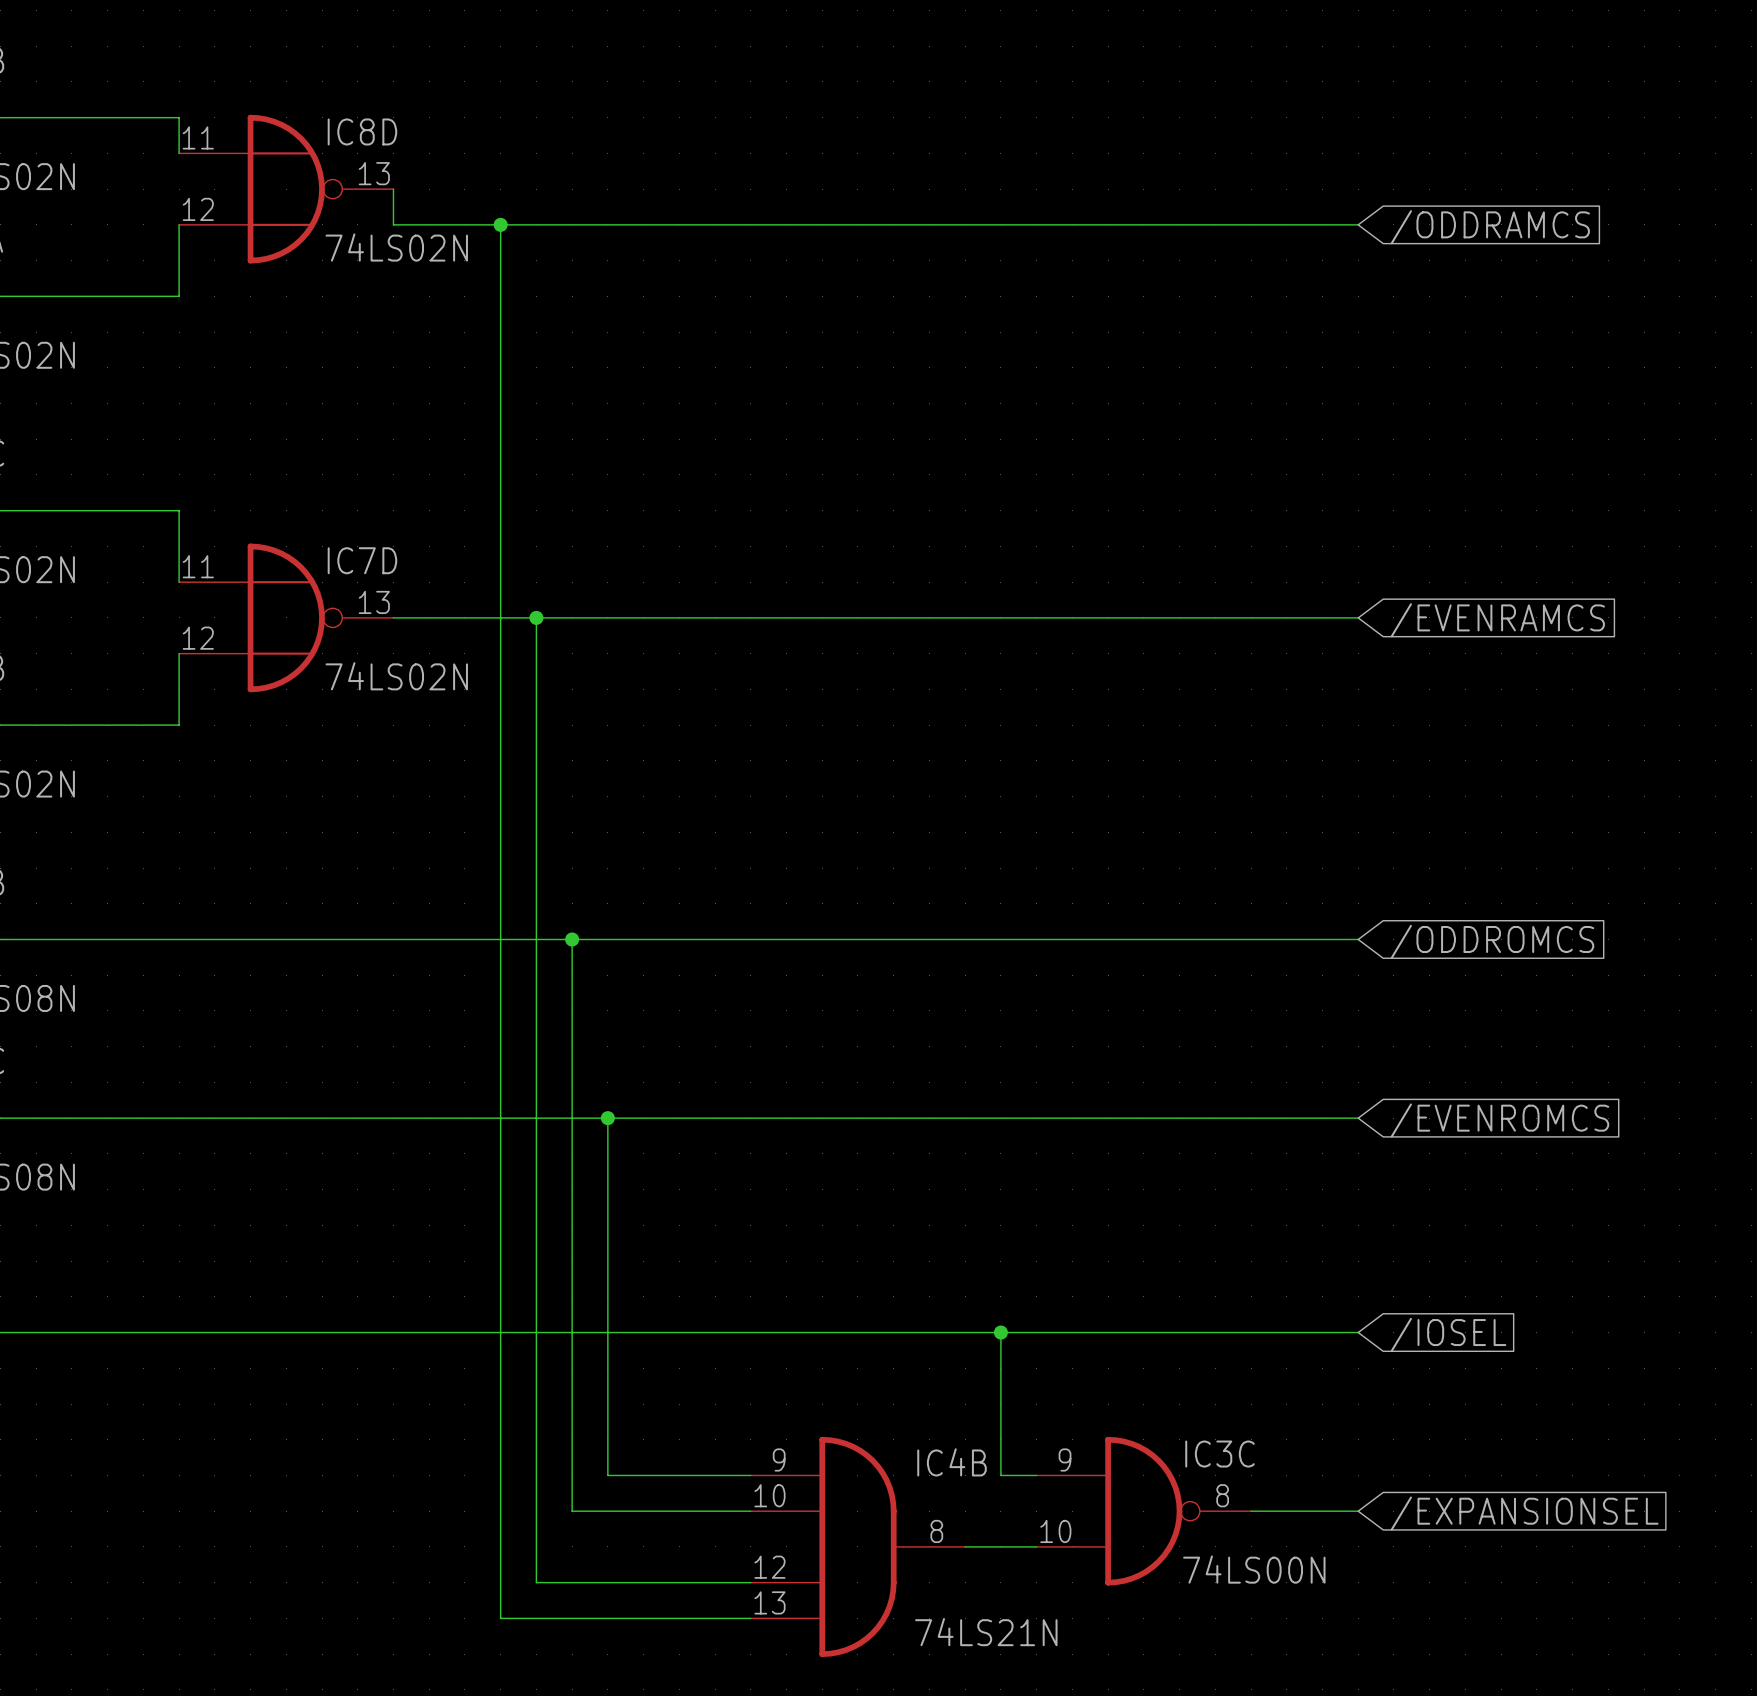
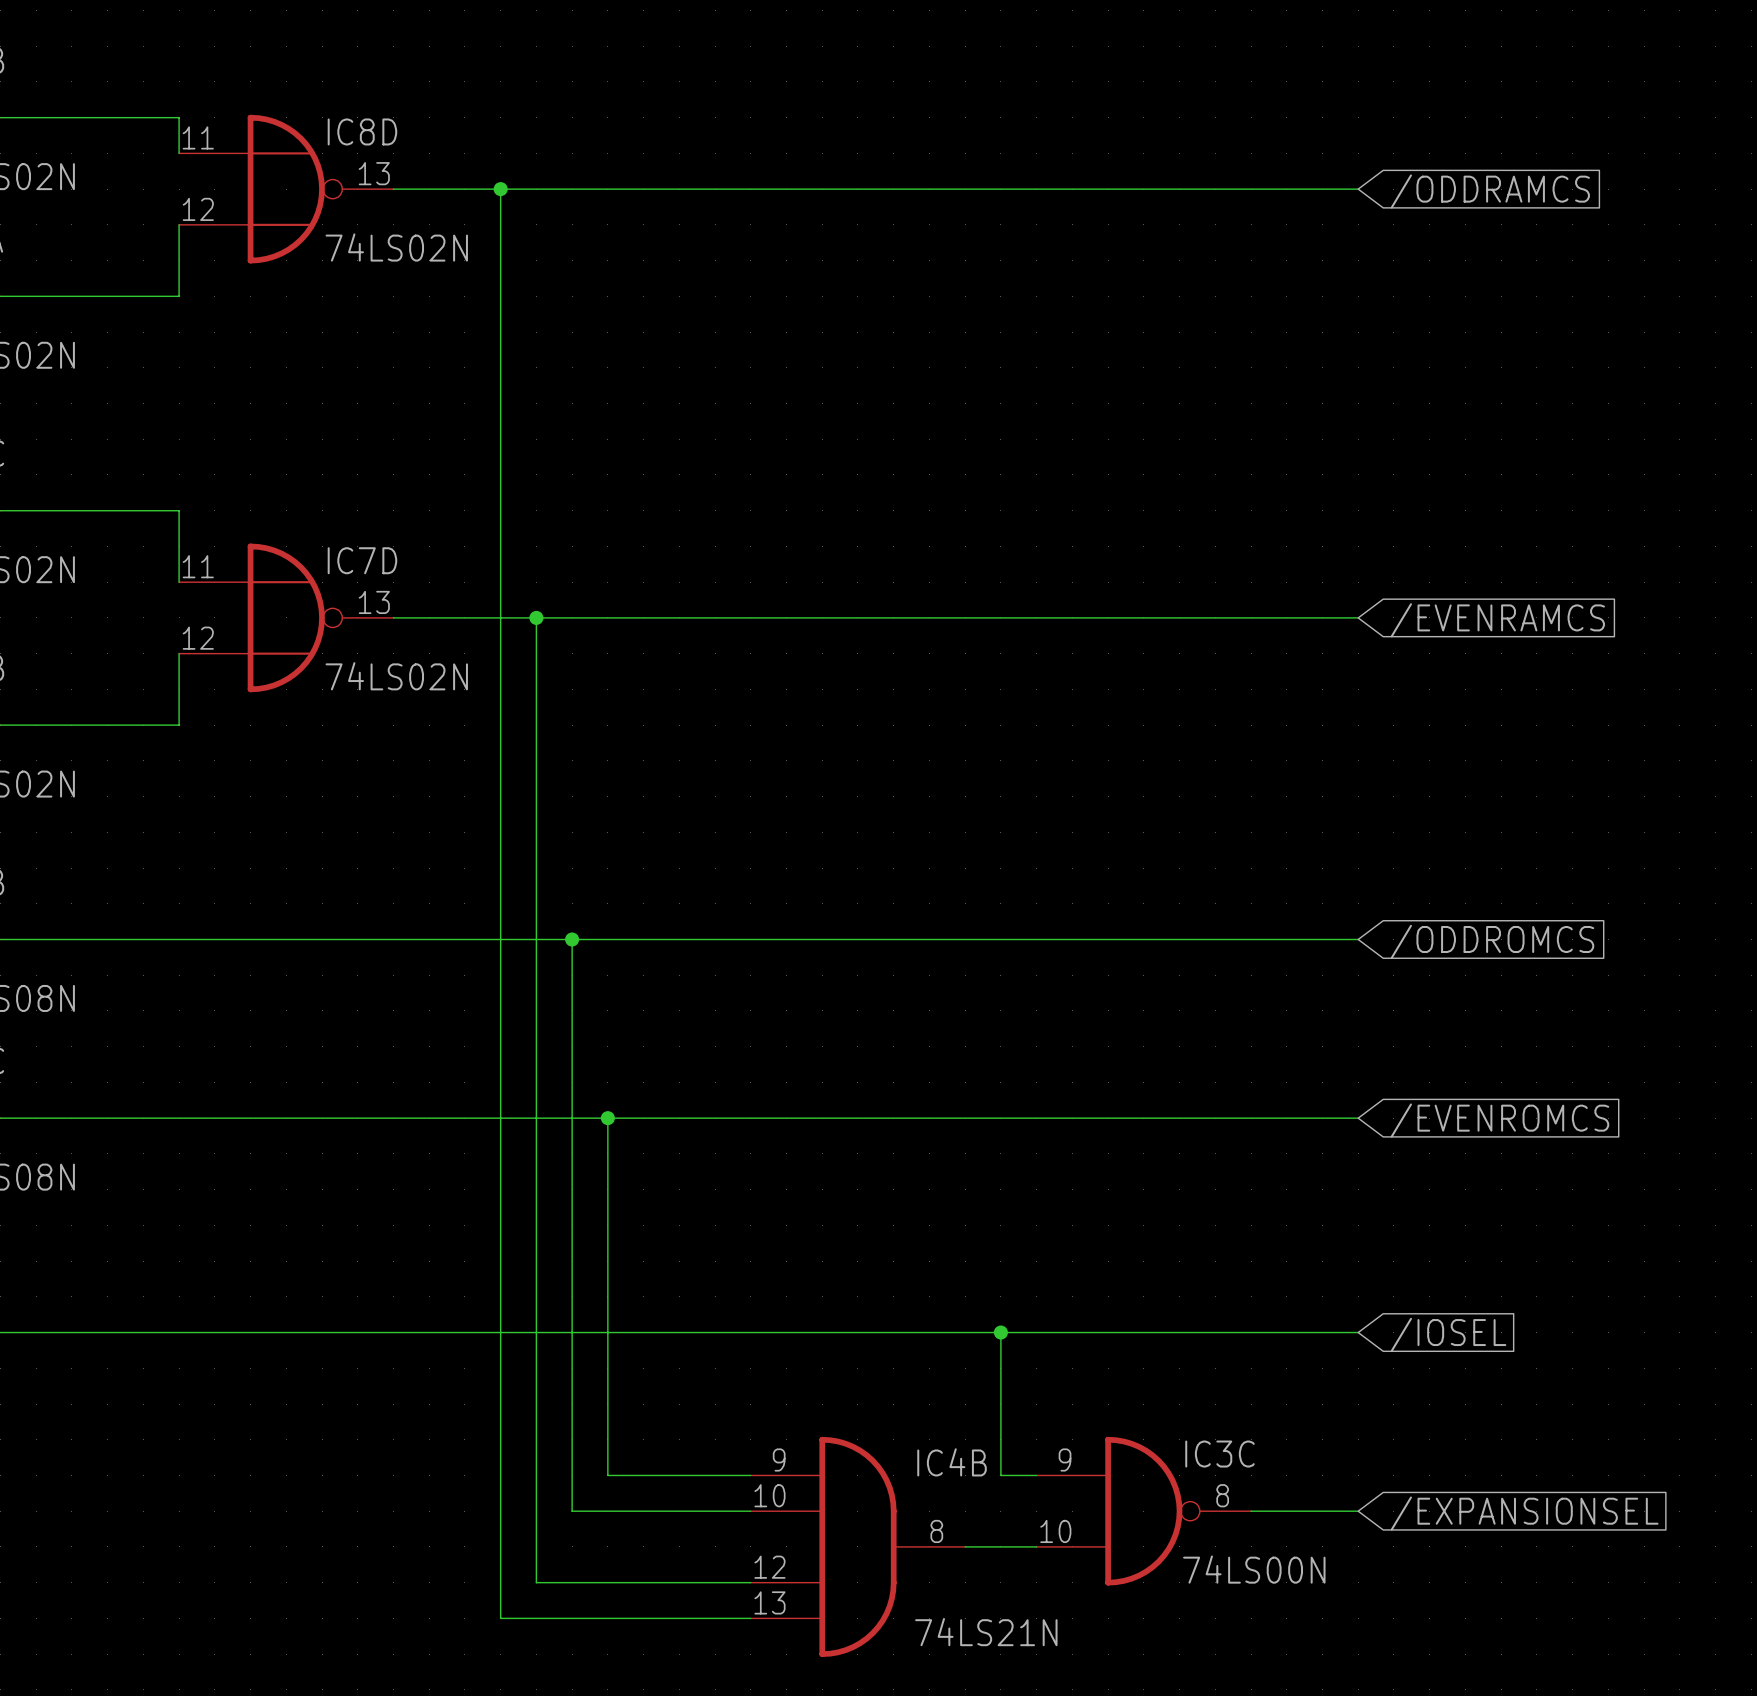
wire: (393, 189) (393, 224) (1358, 224) -> (393, 189) (1358, 189)
wire: none -> (500, 189) (500, 224)
junction position: (500, 224) -> (500, 189)
global label position: /ODDRAMCS (1490, 227) -> /ODDRAMCS (1490, 191)

